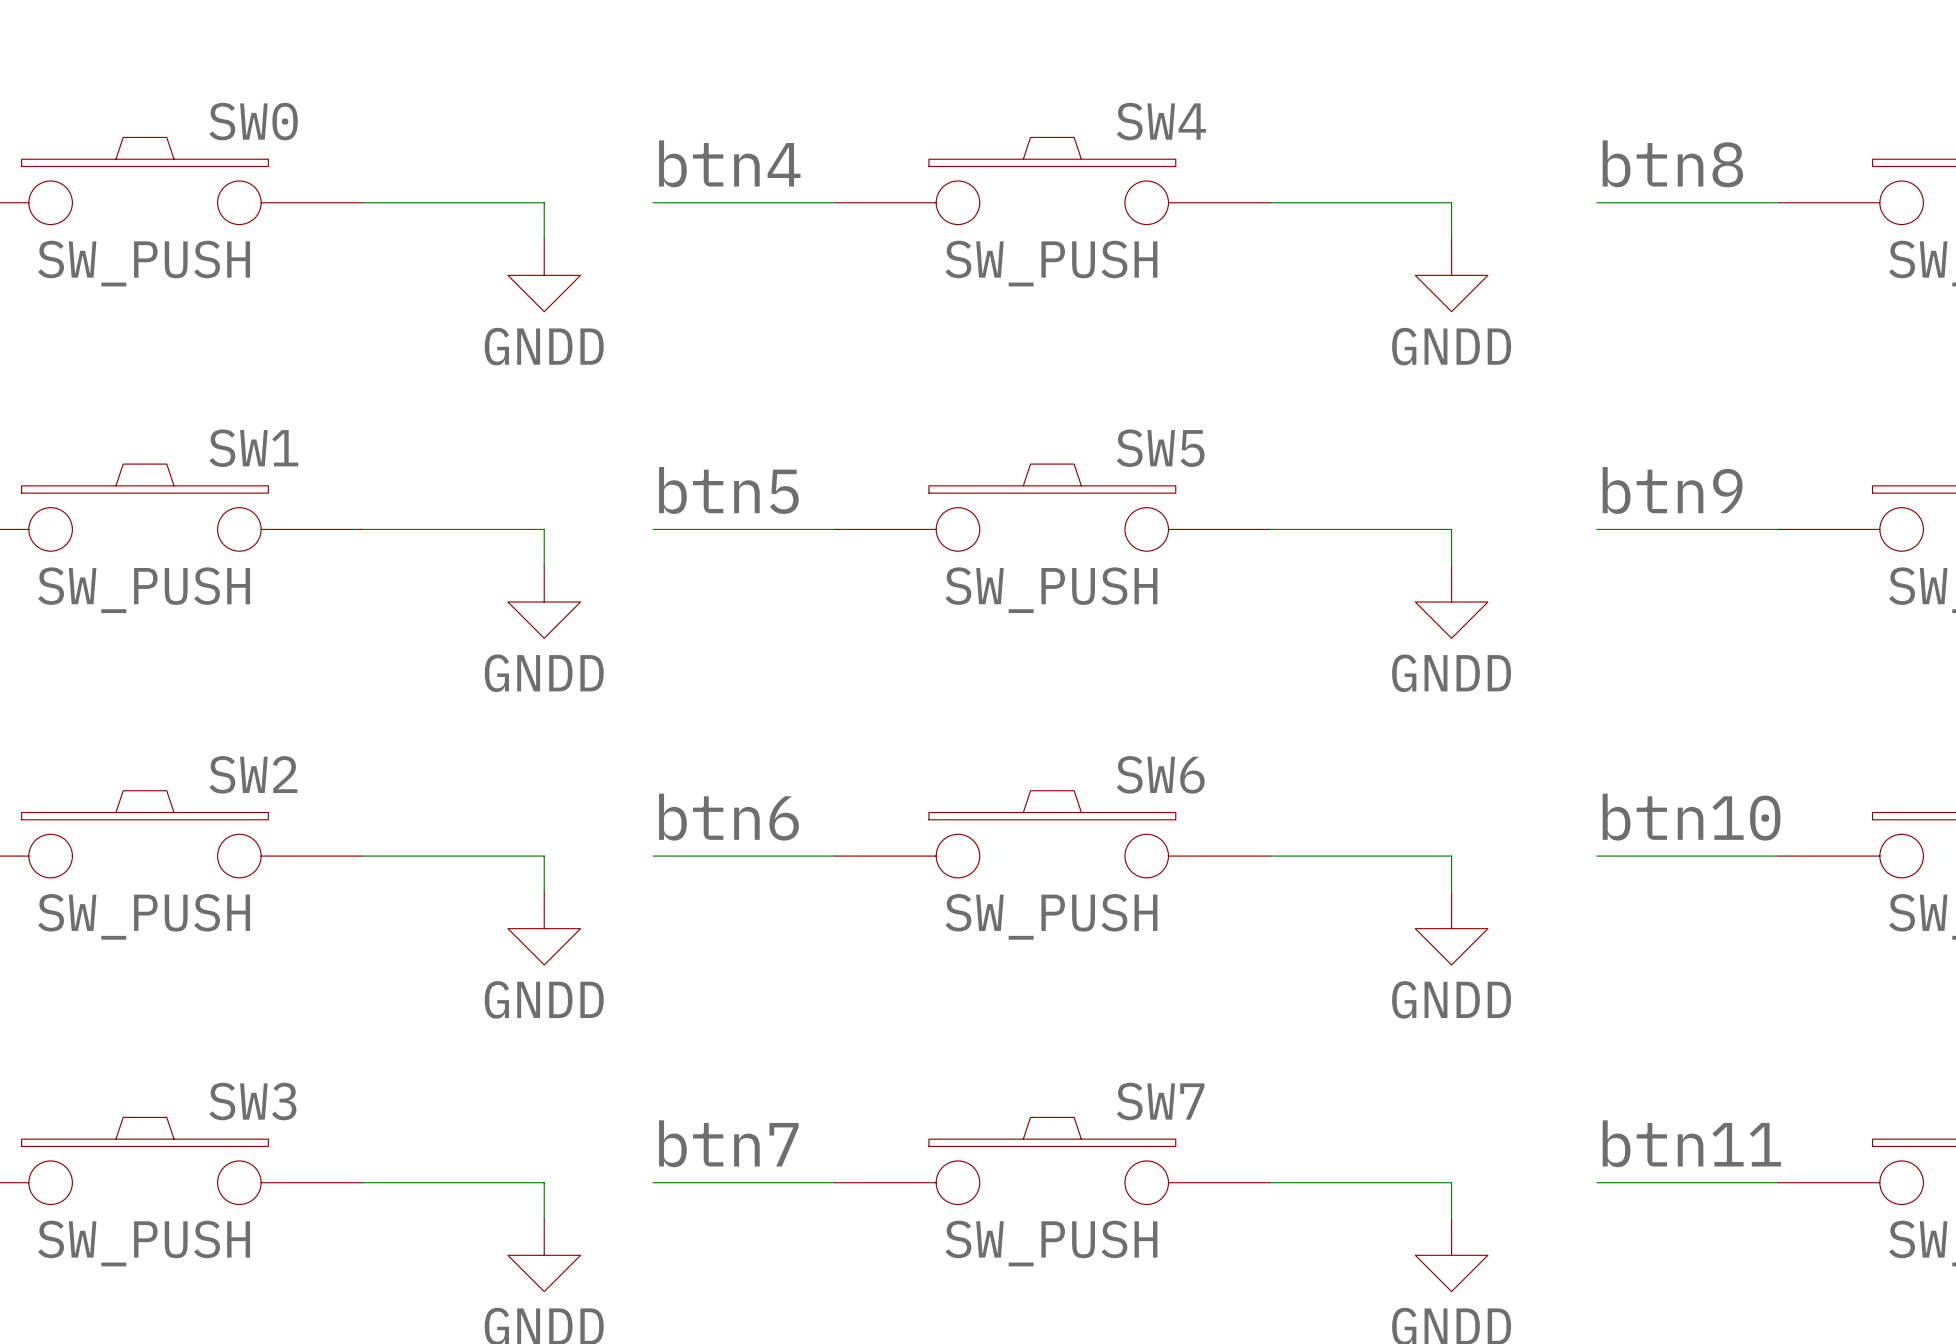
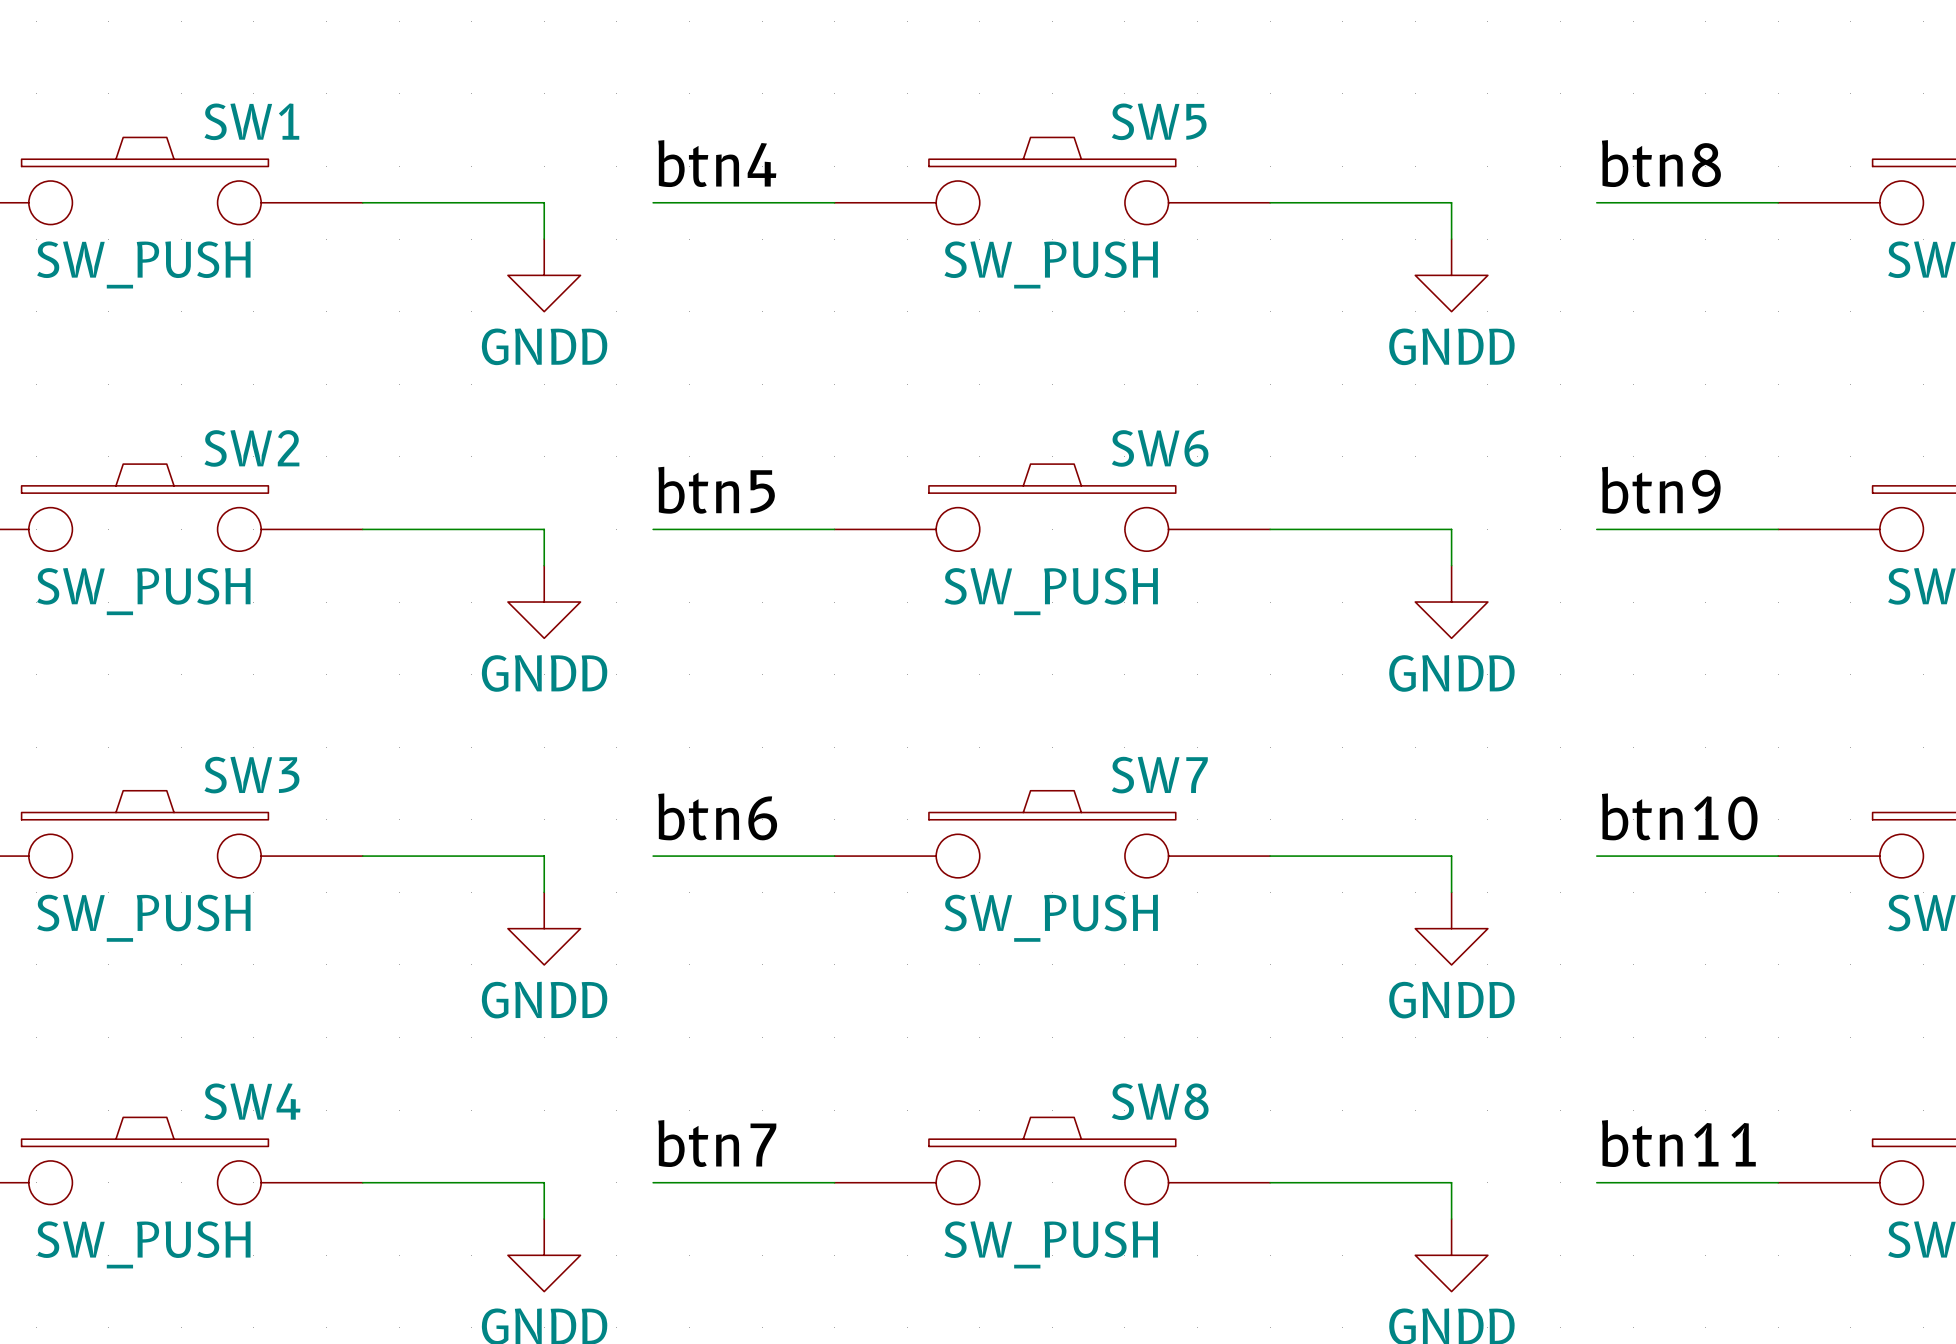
SW0 name: SW0 (253, 121) -> SW1 (251, 121)
SW4 name: SW4 (1161, 121) -> SW5 (1159, 121)
SW1 name: SW1 (253, 448) -> SW2 (251, 448)
SW5 name: SW5 (1160, 448) -> SW6 (1160, 448)
SW2 name: SW2 (253, 774) -> SW3 (251, 775)
SW6 name: SW6 (1160, 774) -> SW7 (1159, 775)
SW3 name: SW3 (252, 1101) -> SW4 (252, 1101)
SW7 name: SW7 (1160, 1101) -> SW8 (1160, 1101)

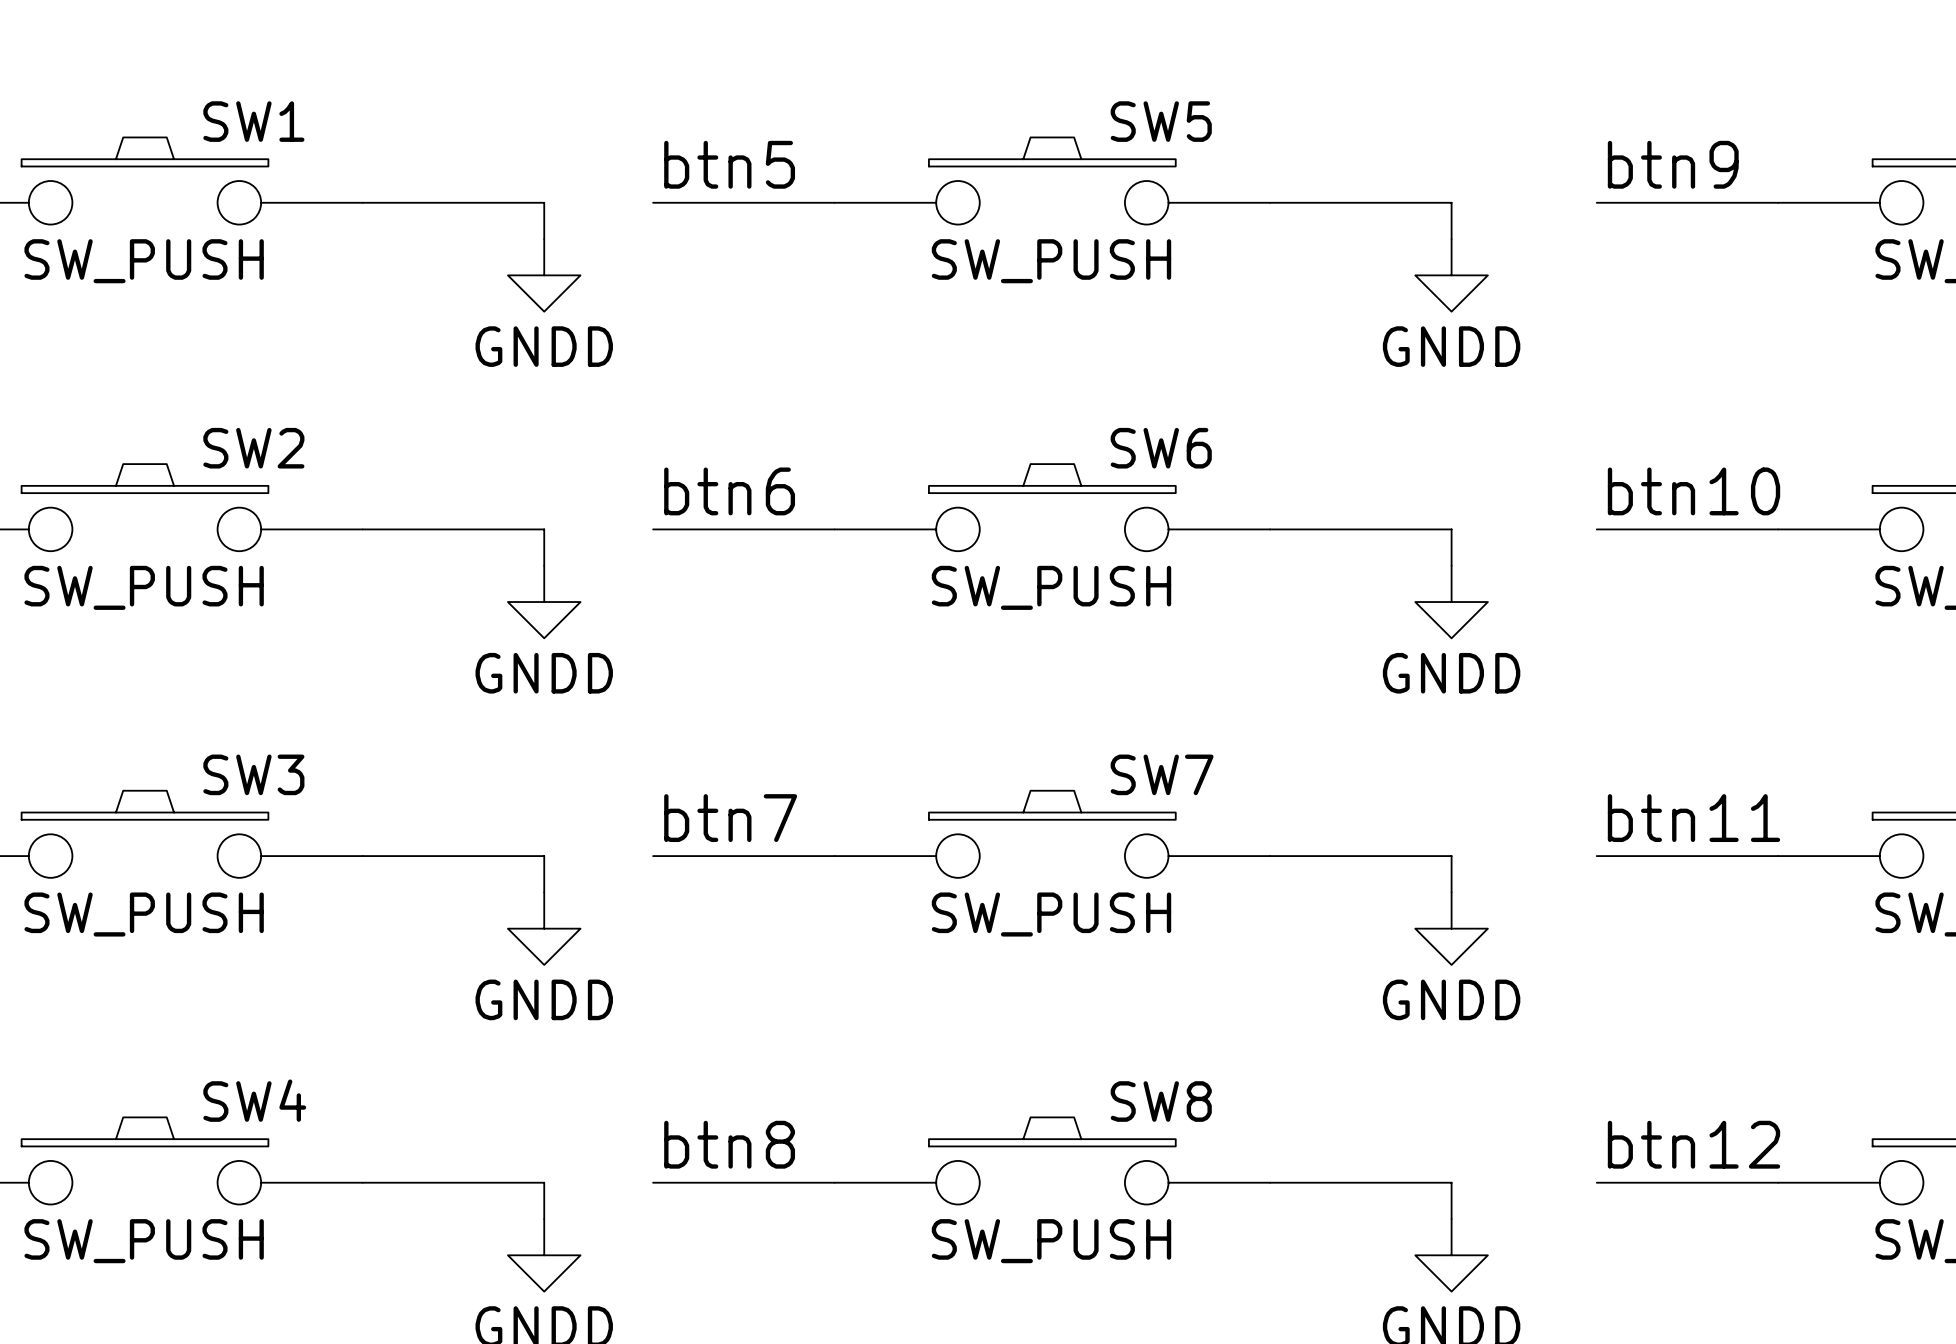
label: btn4 (717, 163) -> btn5 (729, 164)
label: btn8 (1661, 163) -> btn9 (1673, 164)
label: btn5 (716, 490) -> btn6 (729, 491)
label: btn9 (1661, 490) -> btn10 (1693, 491)
label: btn6 (717, 816) -> btn7 (730, 818)
label: btn10 (1679, 816) -> btn11 (1693, 818)
label: btn7 (717, 1143) -> btn8 (729, 1144)
label: btn11 (1678, 1143) -> btn12 (1693, 1144)

